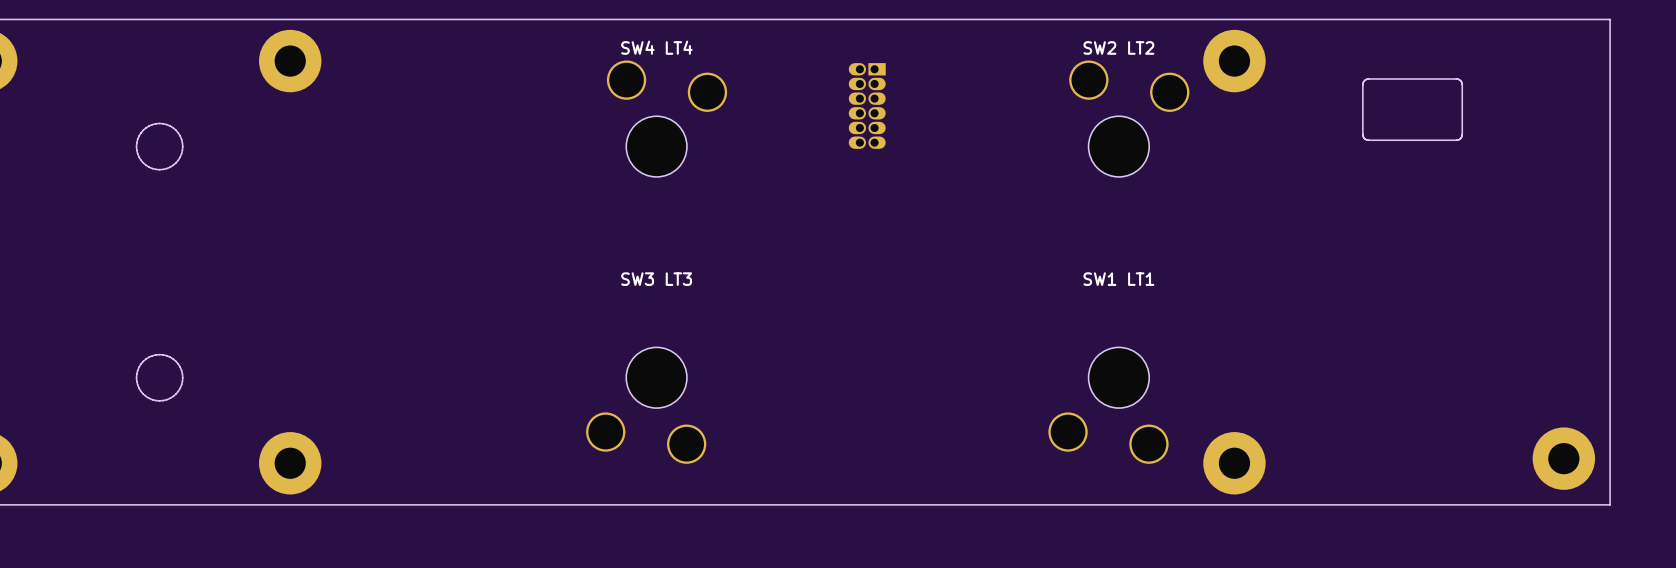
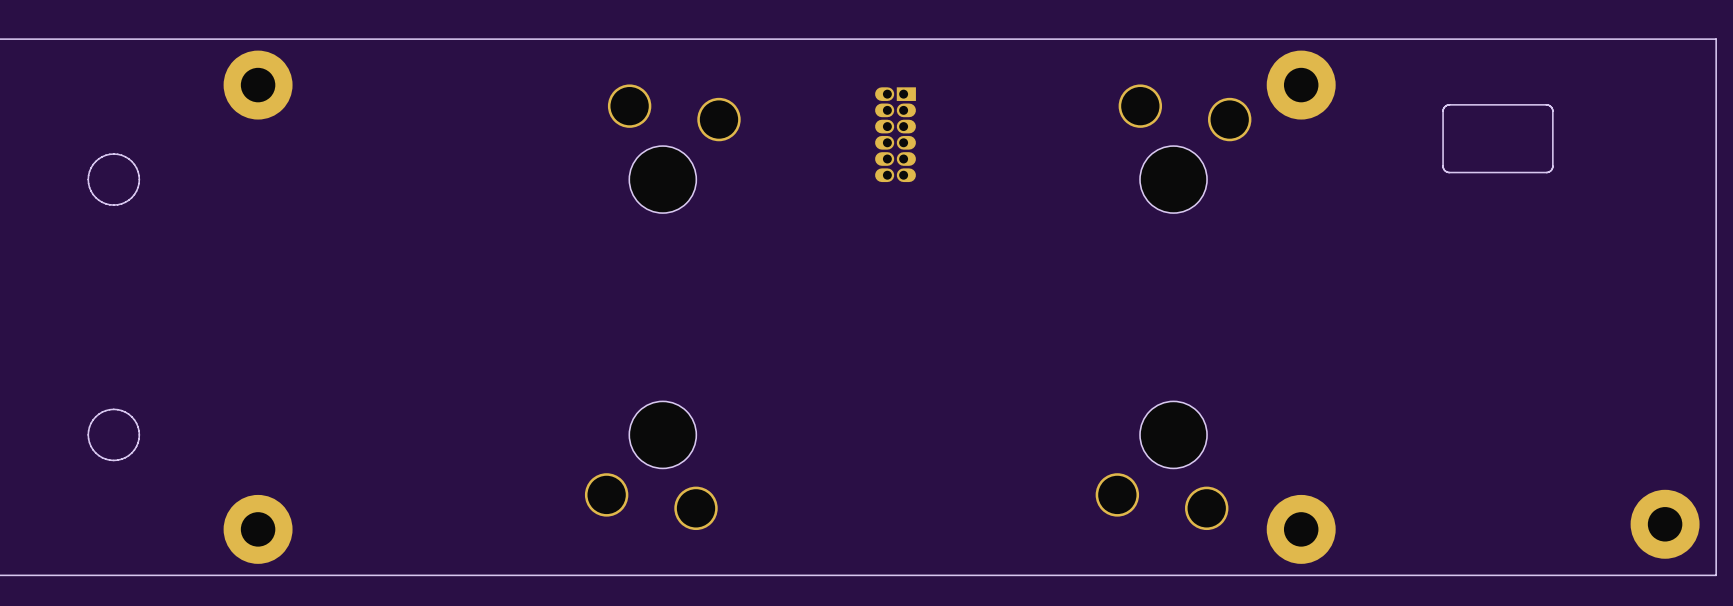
text: SW4 LT4 (656, 47) -> none
text: SW2 LT2 (1118, 47) -> none
text: SW3 LT3 (656, 279) -> none
text: SW1 LT1 (1118, 279) -> none

